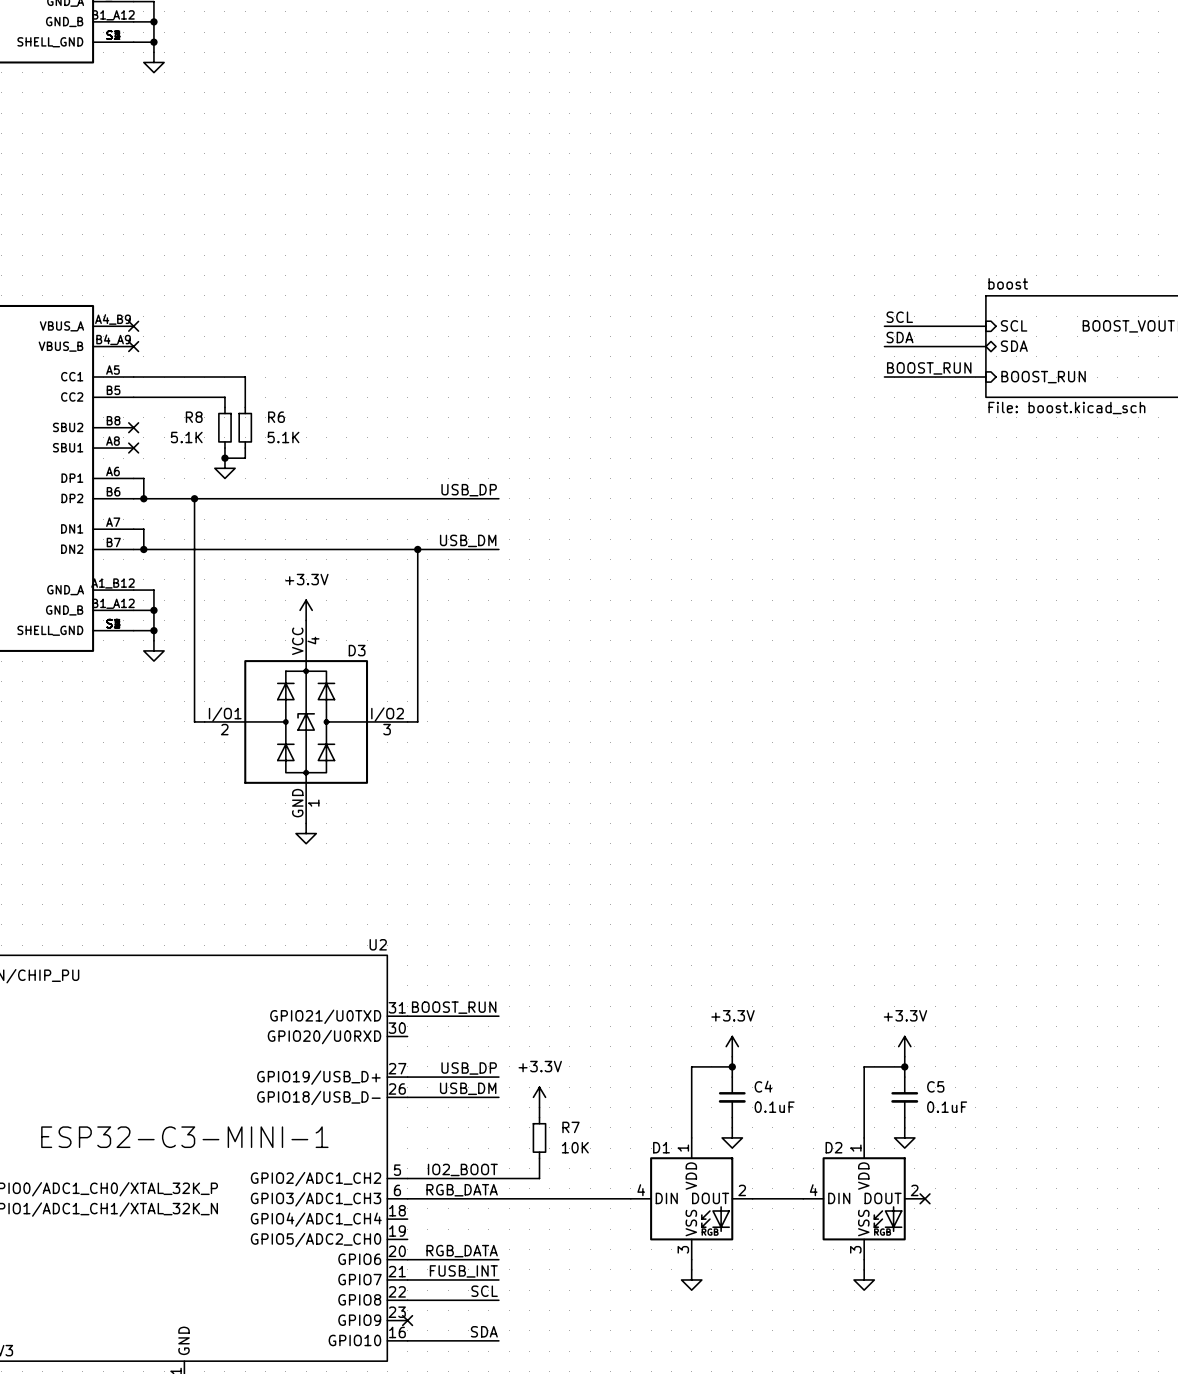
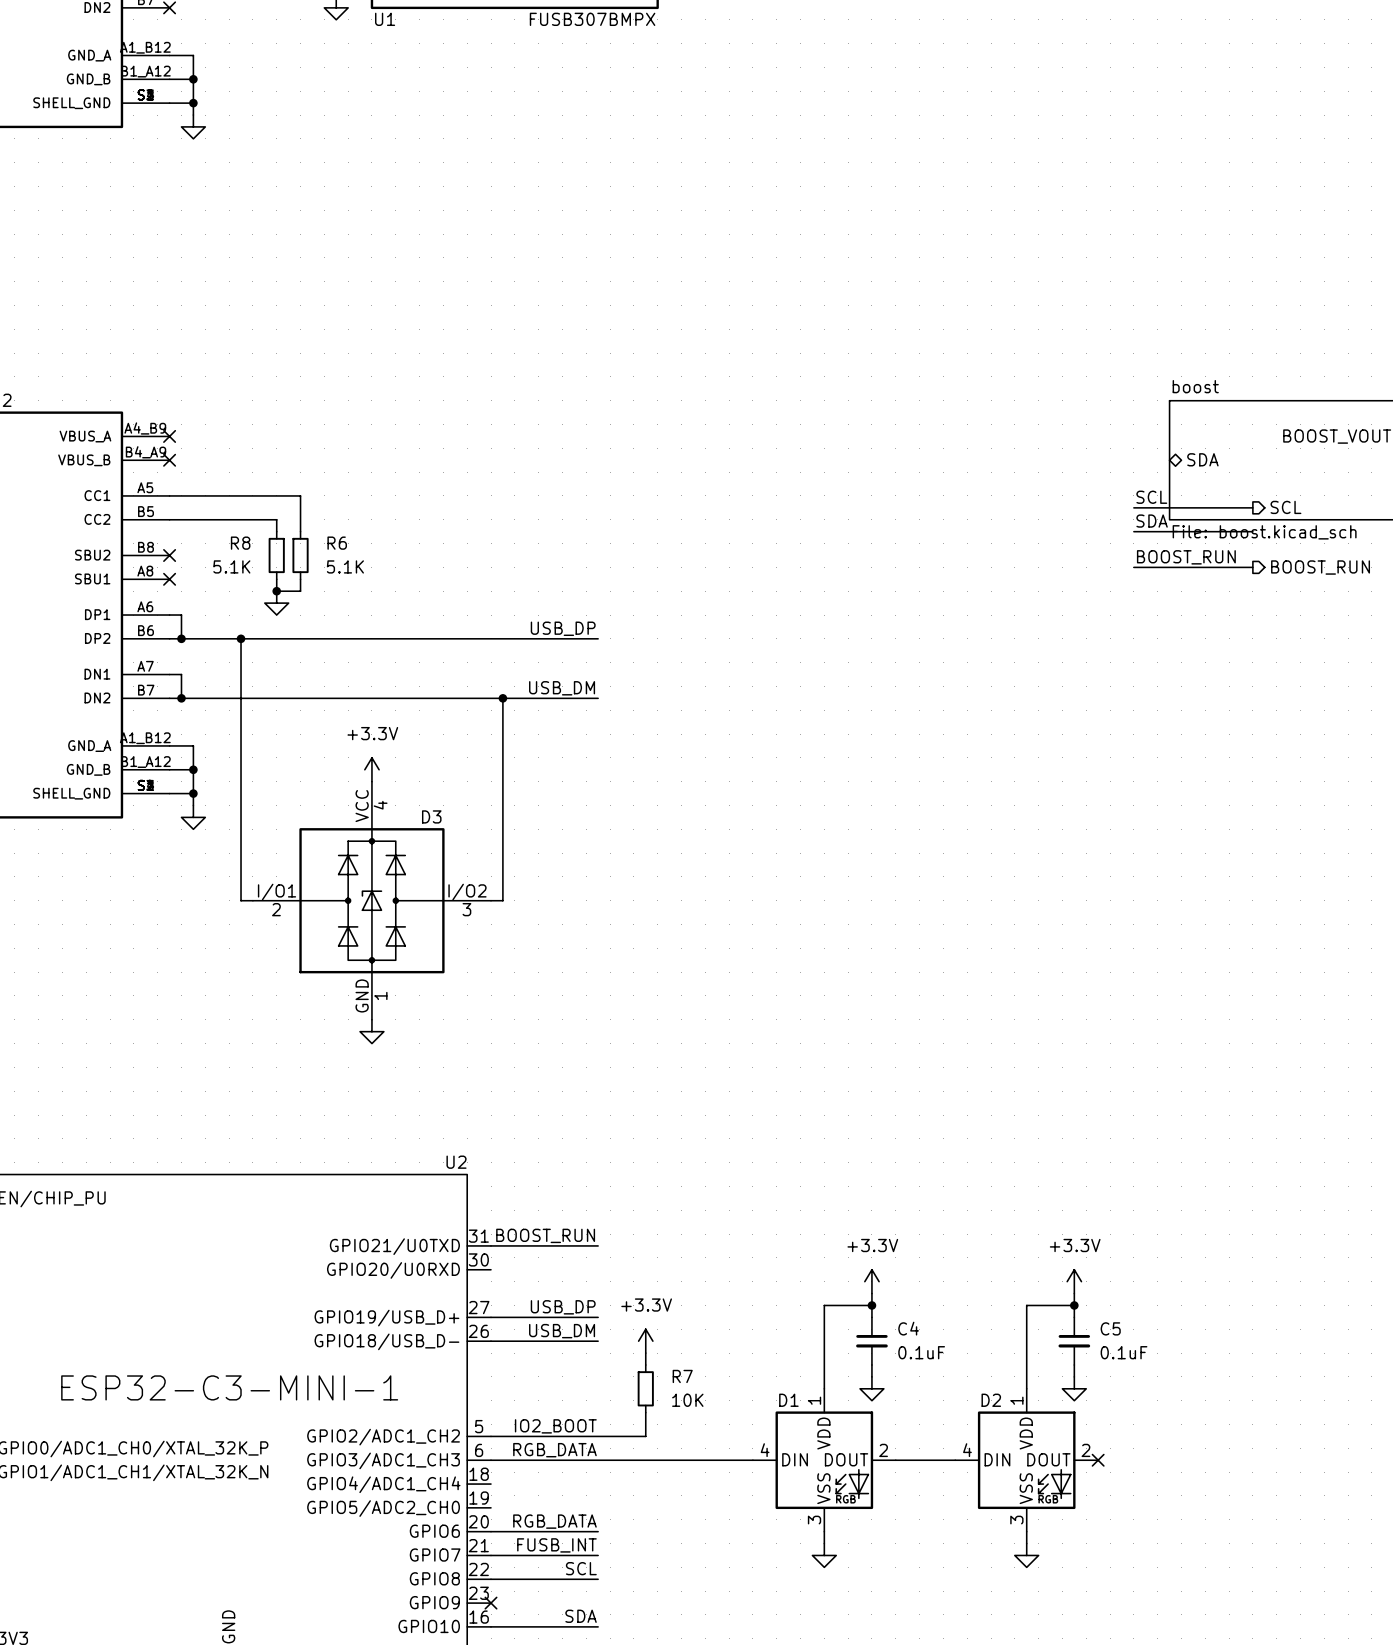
label position: SCL (899, 317) -> SCL (1151, 497)
sheet pin position: SCL (1014, 325) -> SCL (1285, 507)
wire: (884, 326) (985, 326) -> (1133, 507) (1252, 507)
label position: SDA (900, 337) -> SDA (1152, 521)
wire: (884, 346) (985, 346) -> (1133, 531) (1252, 531)
label position: BOOST_RUN (929, 368) -> BOOST_RUN (1186, 557)
wire: (884, 377) (985, 377) -> (1133, 567) (1252, 567)
sheet pin position: BOOST_RUN (1043, 377) -> BOOST_RUN (1320, 567)

